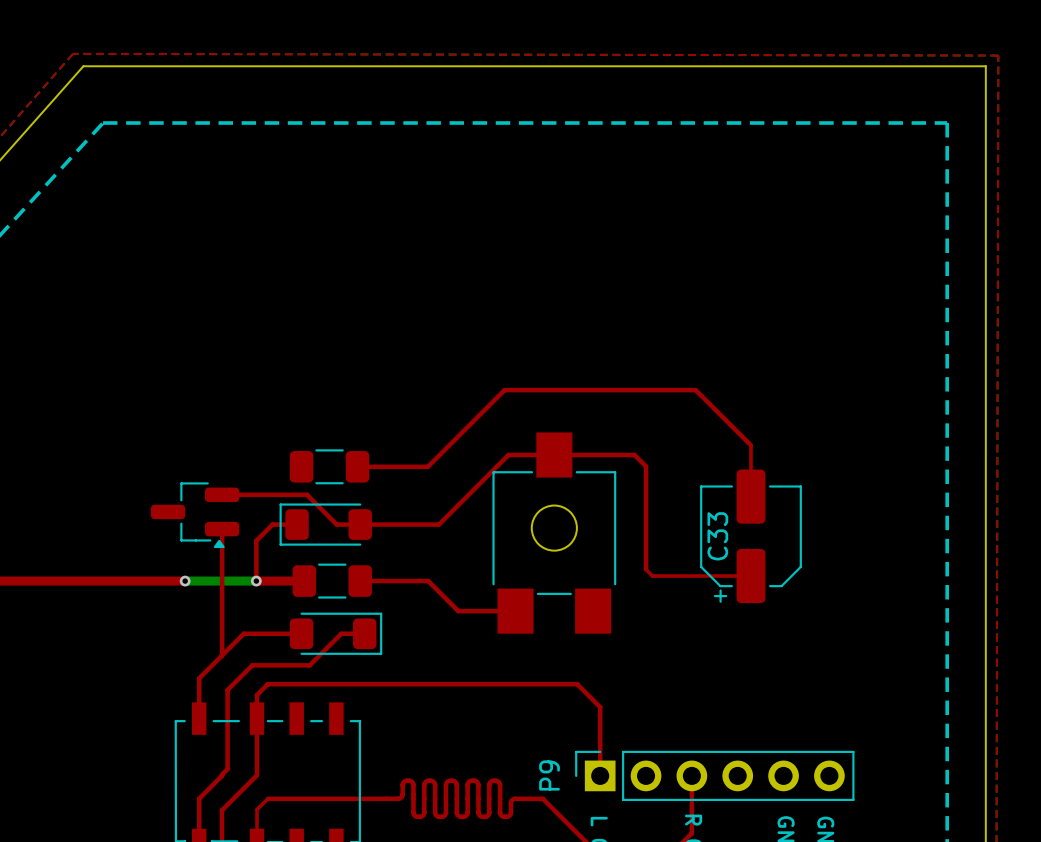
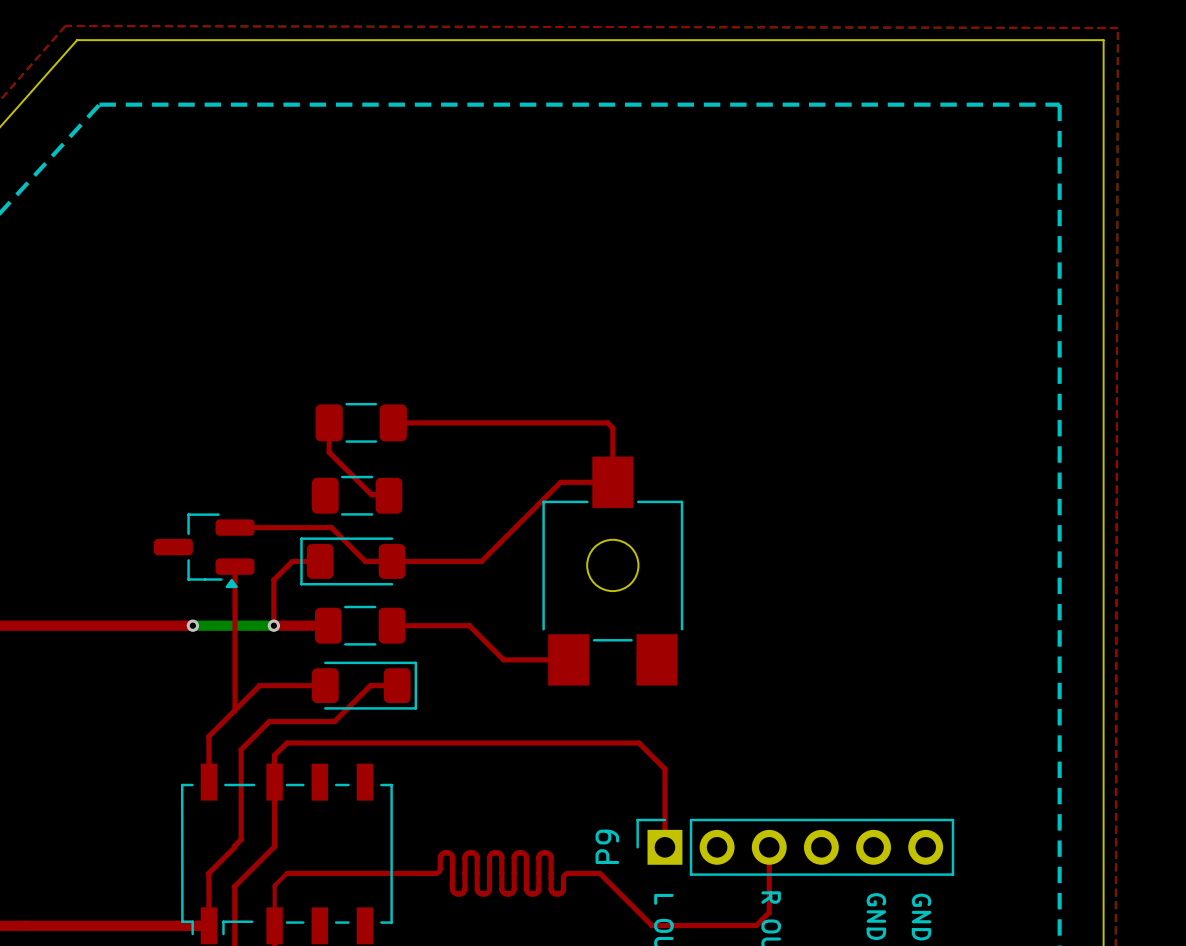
top track: none -> (329, 422) (329, 452) (371, 494) (393, 494)
part: none -> (361, 422)
top track: (554, 455) (634, 455) (646, 466) (646, 569) (652, 576) (750, 576) -> (612, 482) (612, 428) (607, 422) (389, 422)
top track: (357, 466) (427, 466) (504, 390) (695, 390) (750, 445) (750, 496) -> none
C33: (750, 536) -> none

